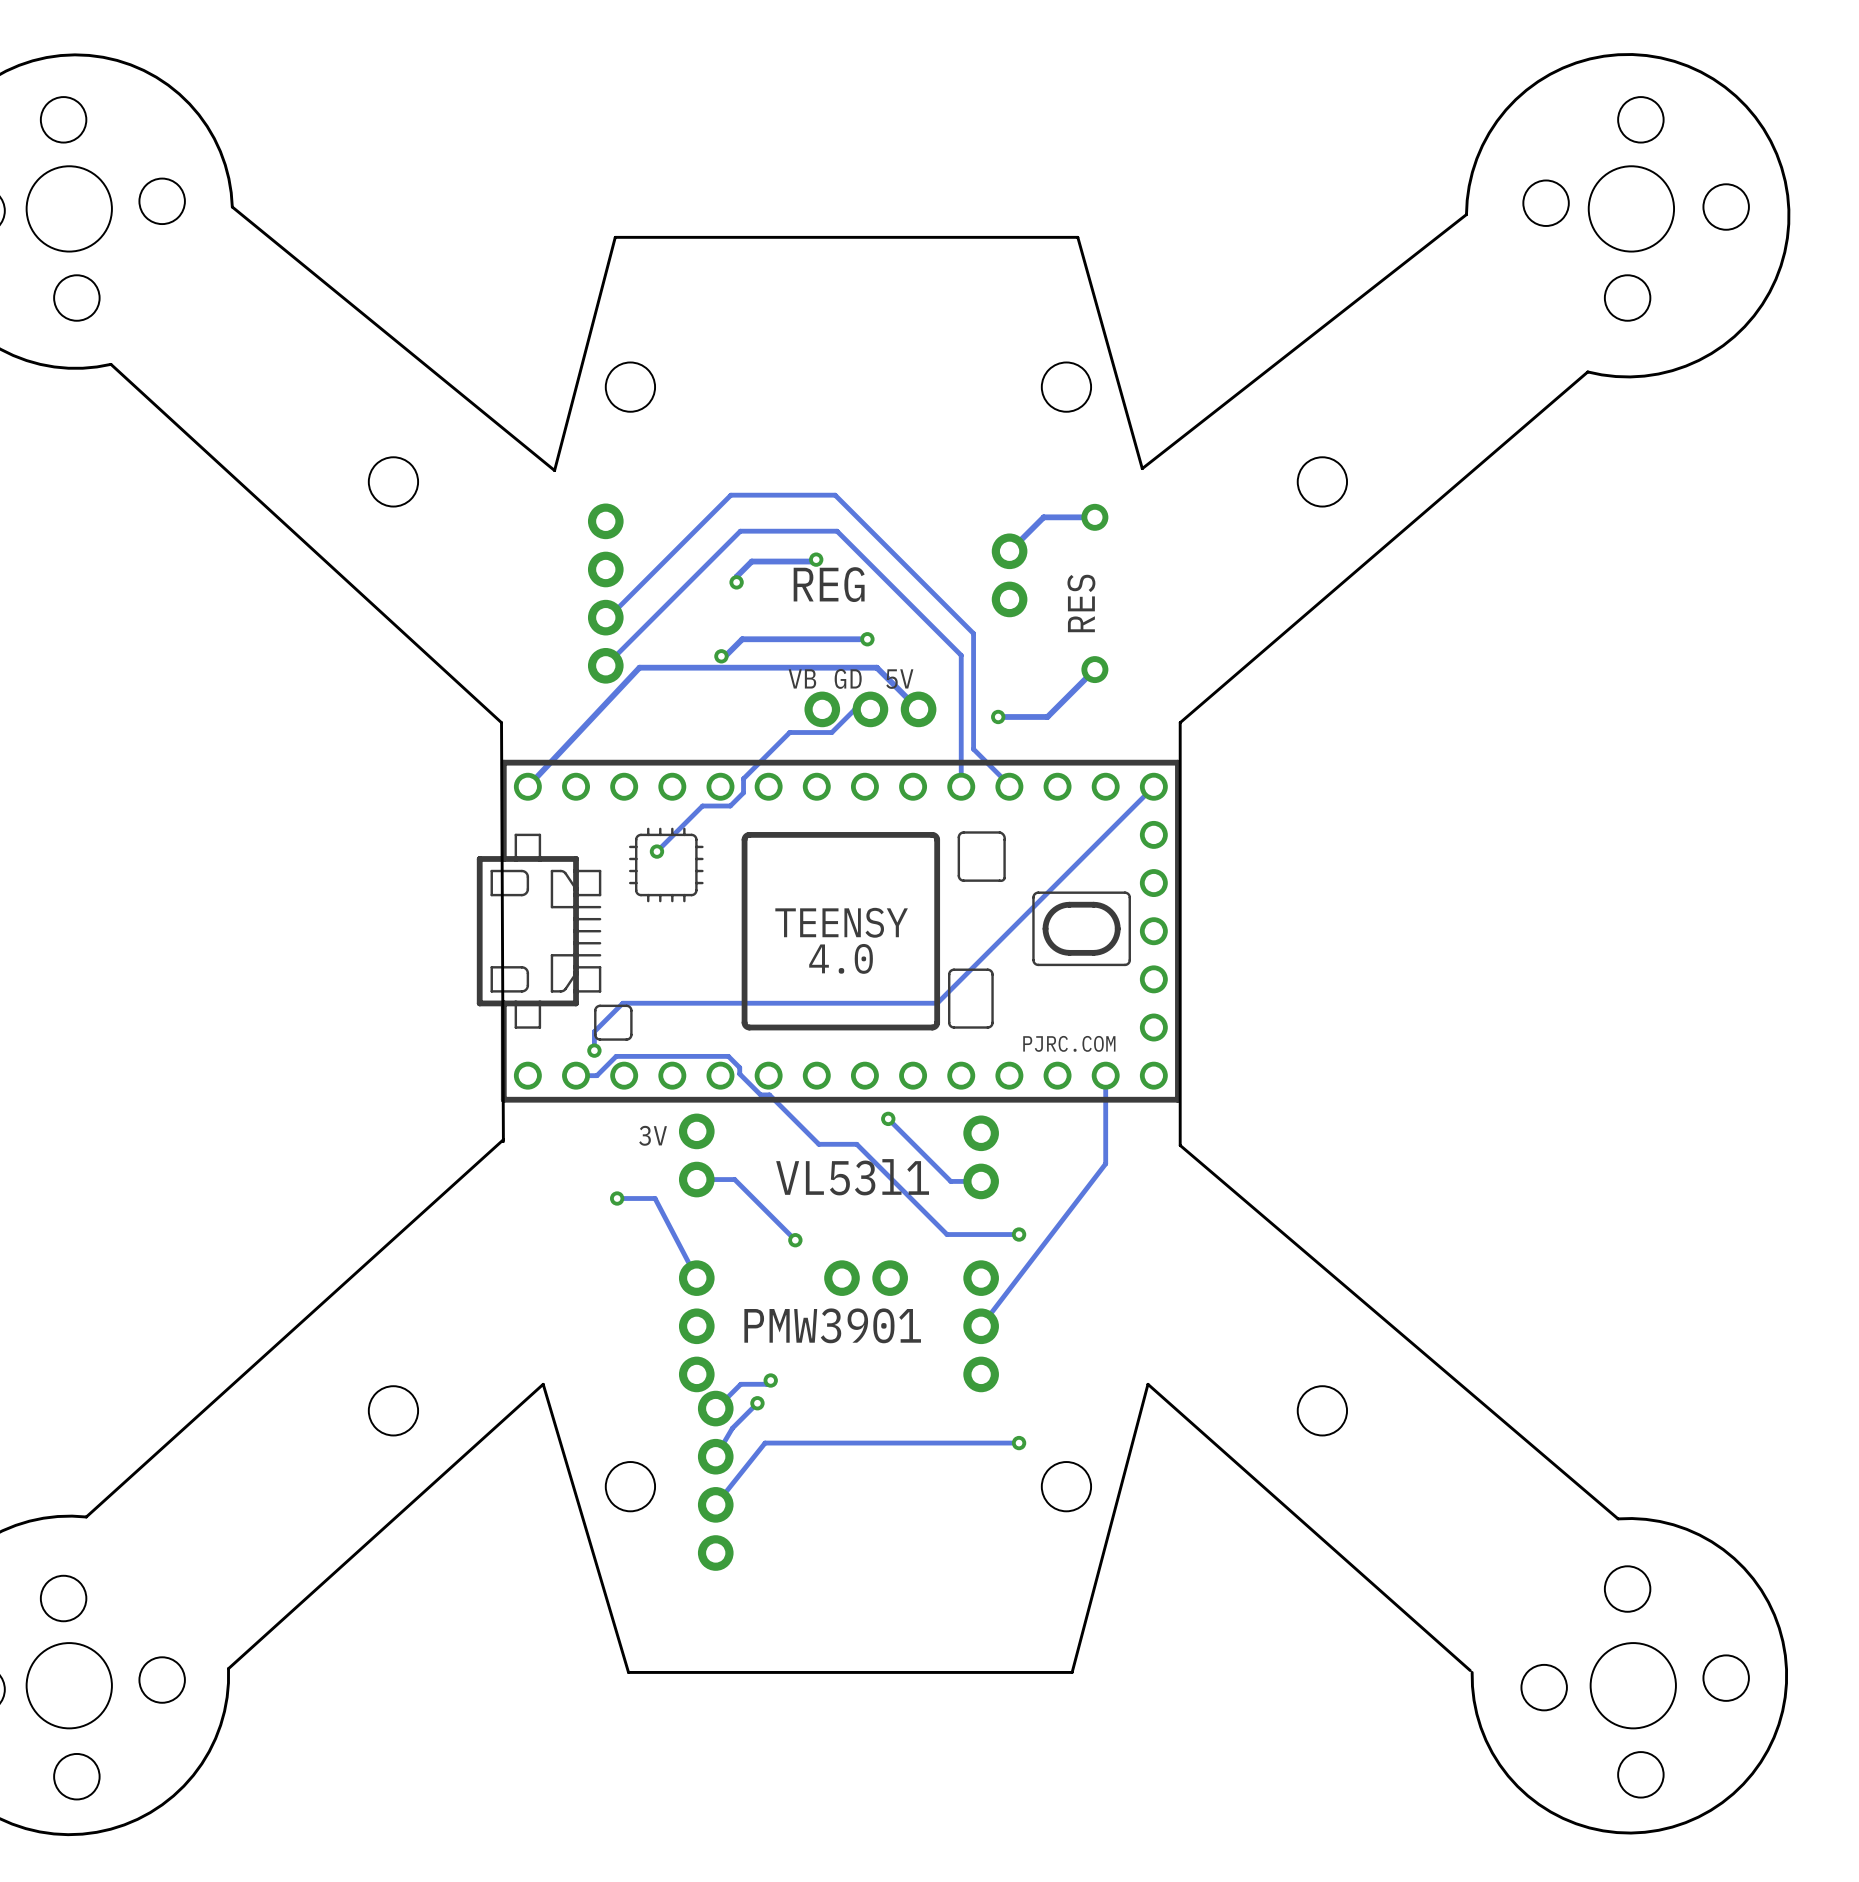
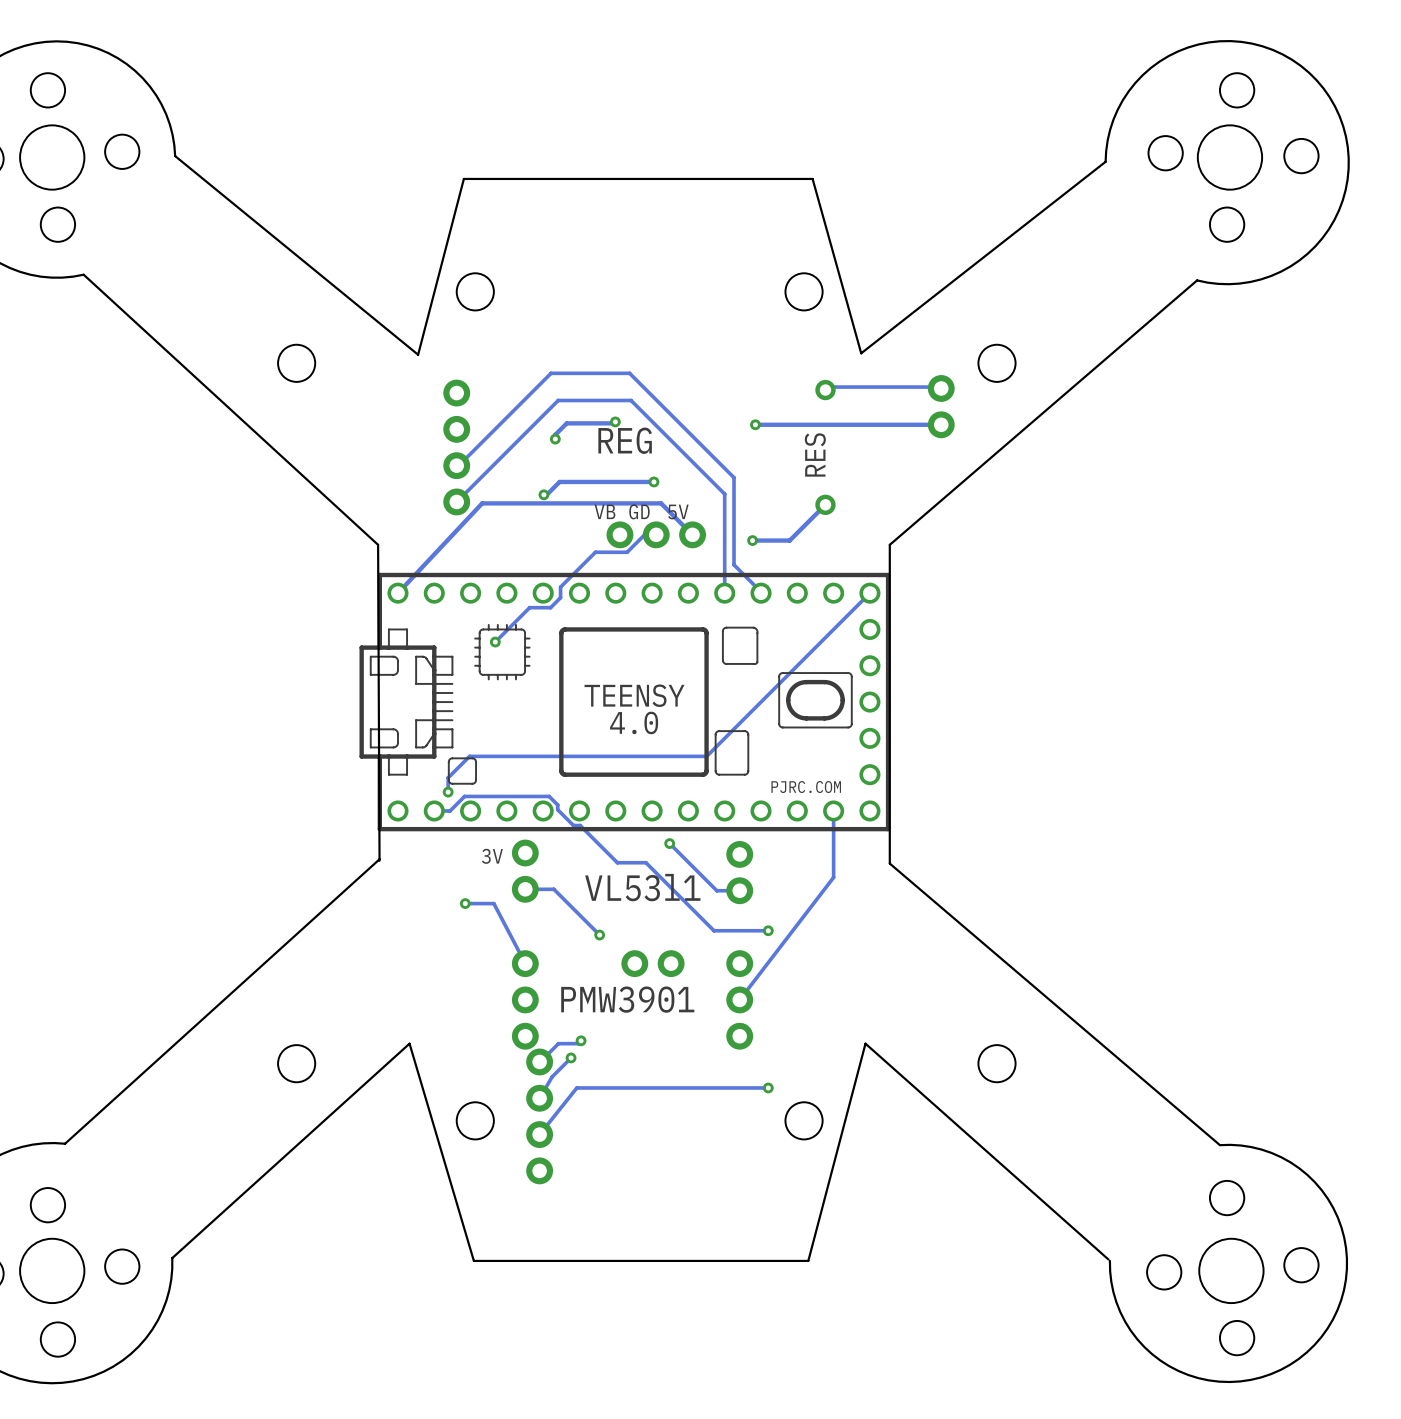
track: (1094, 517) (1043, 517) (1011, 549) -> (825, 390) (828, 387) (942, 387)
via: none -> (755, 424)
track: none -> (941, 424) (755, 424)
part position: (1009, 575) -> (941, 406)

